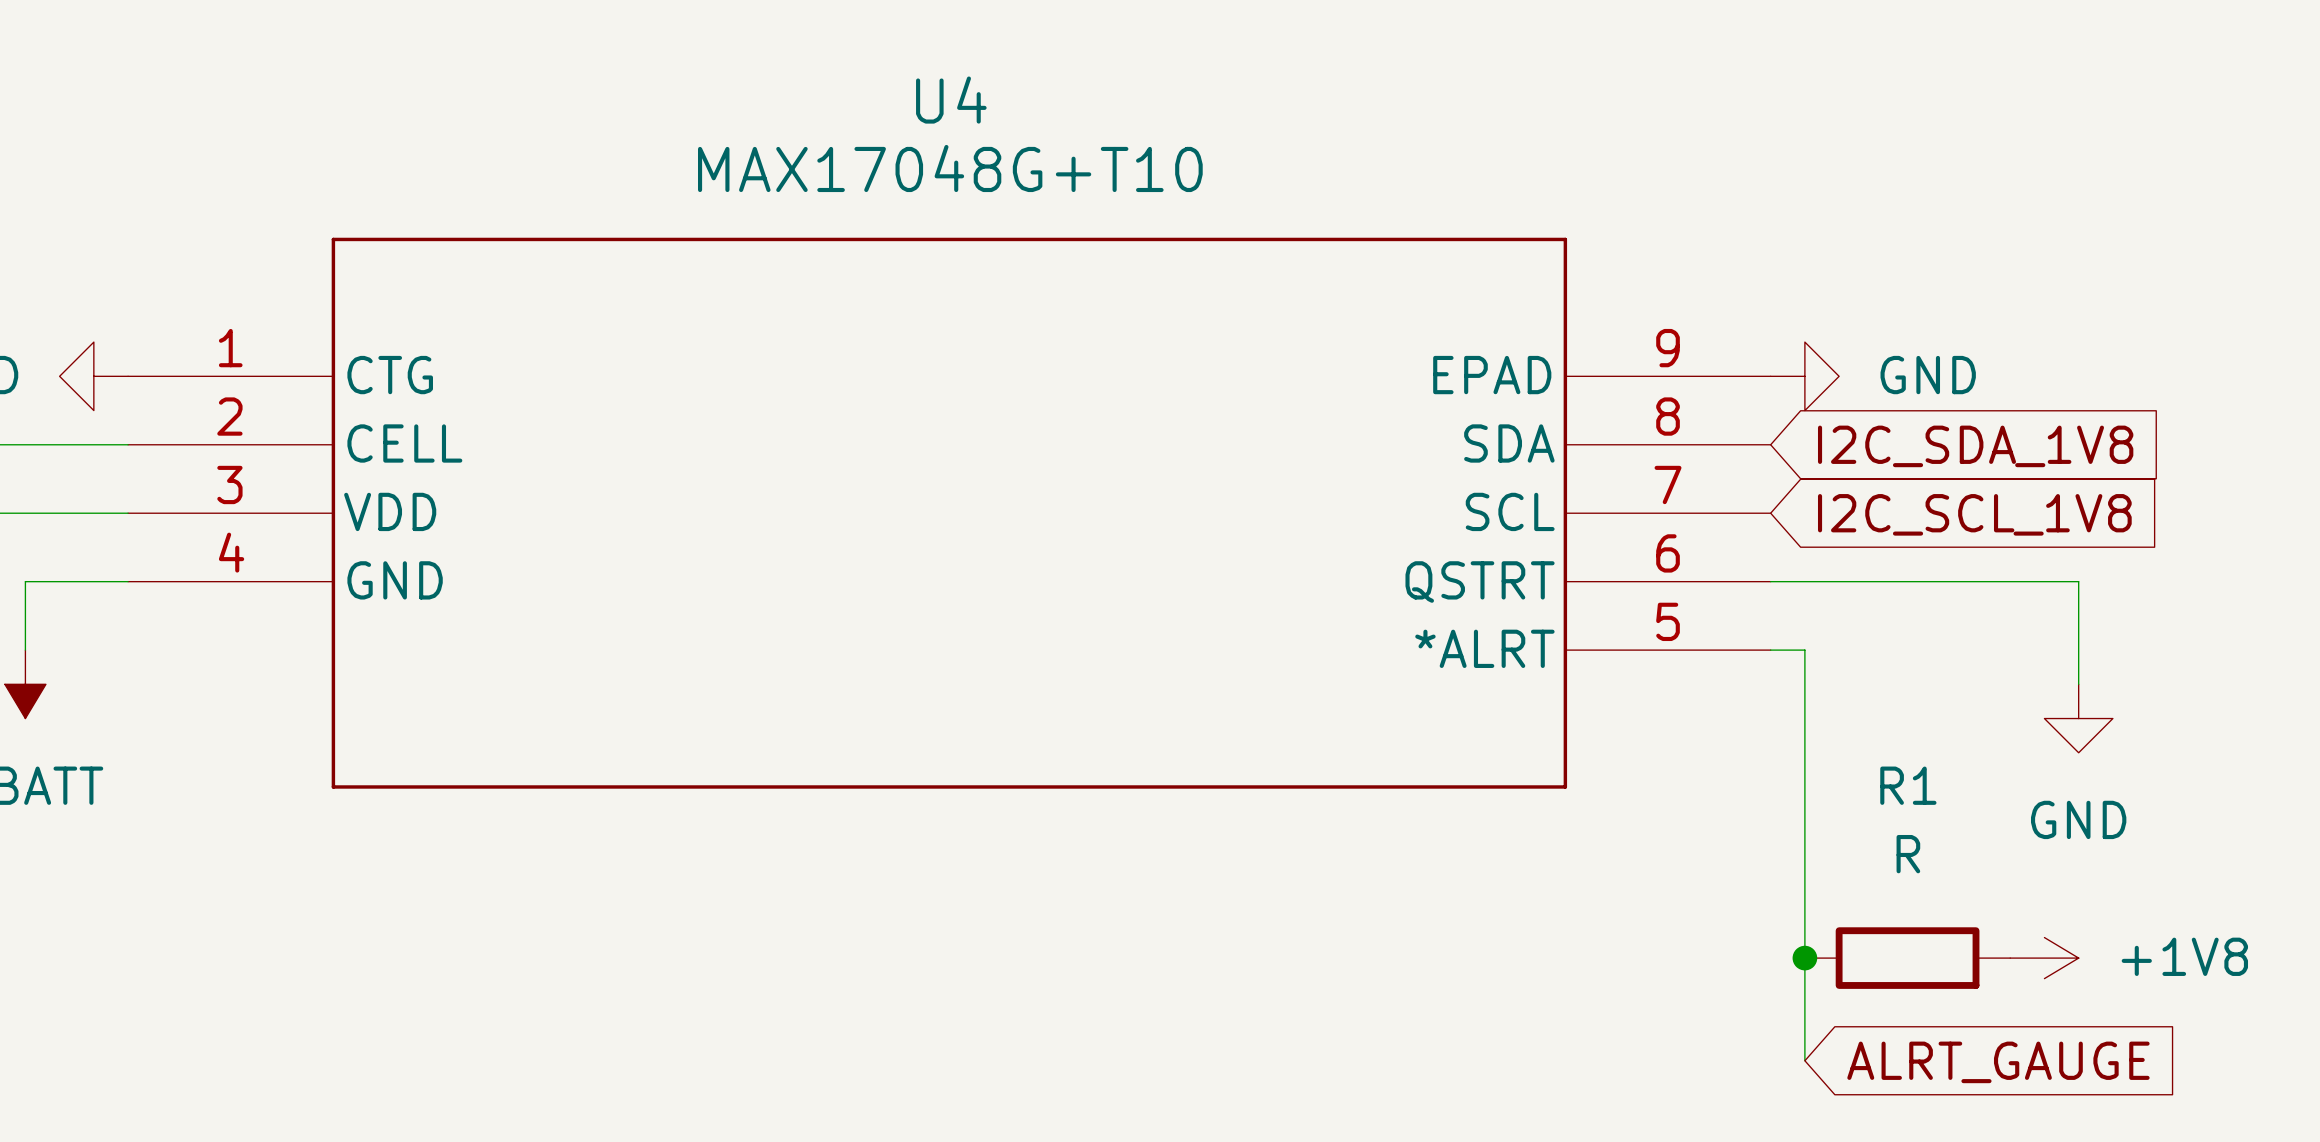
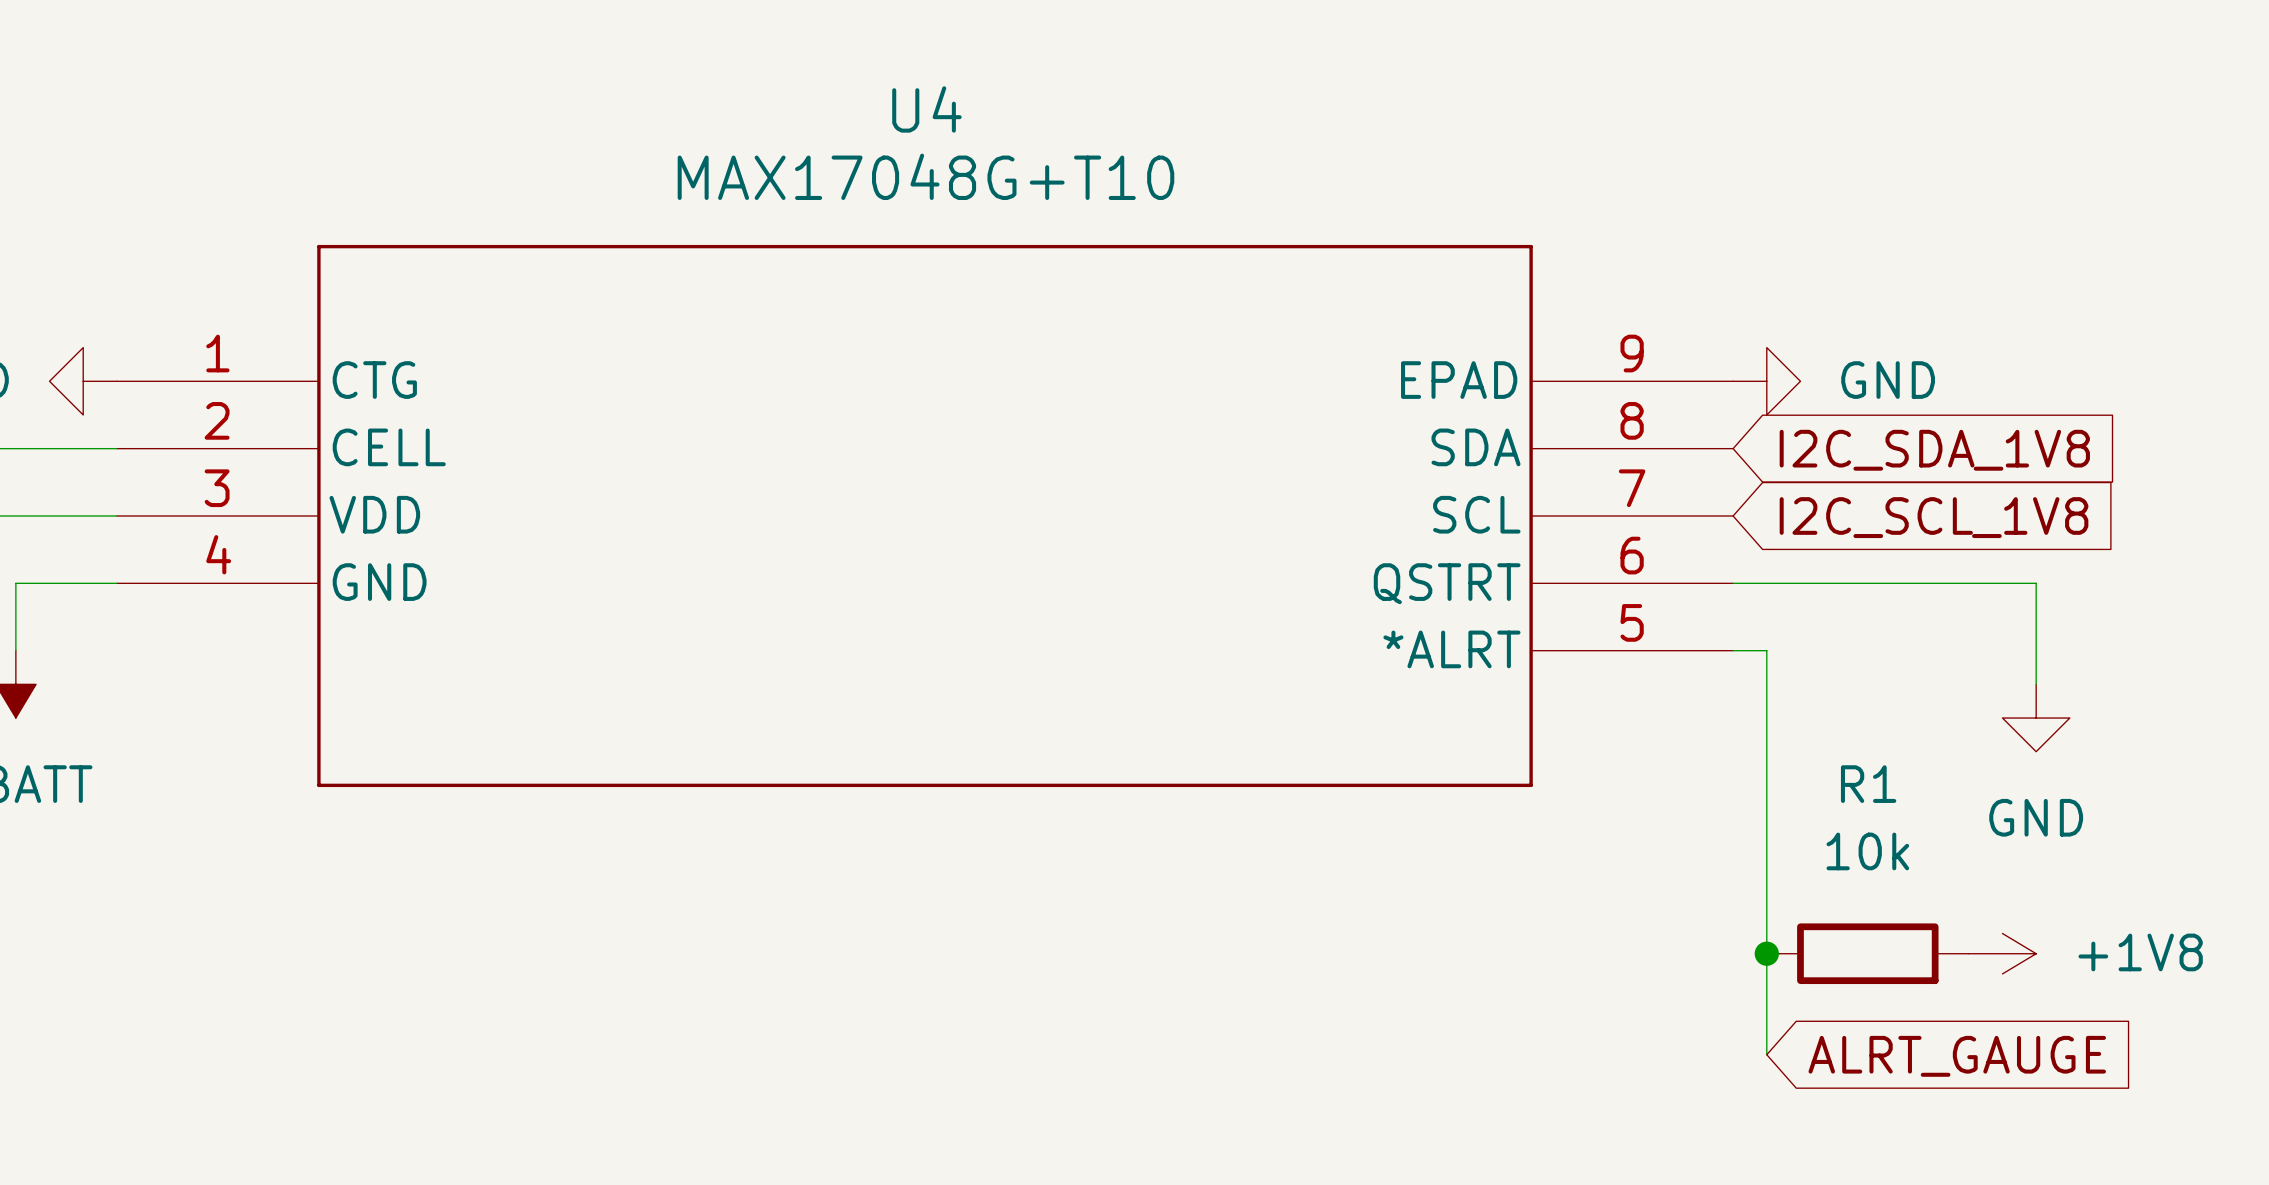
R1 value: R (1908, 854) -> 10k (1867, 851)

